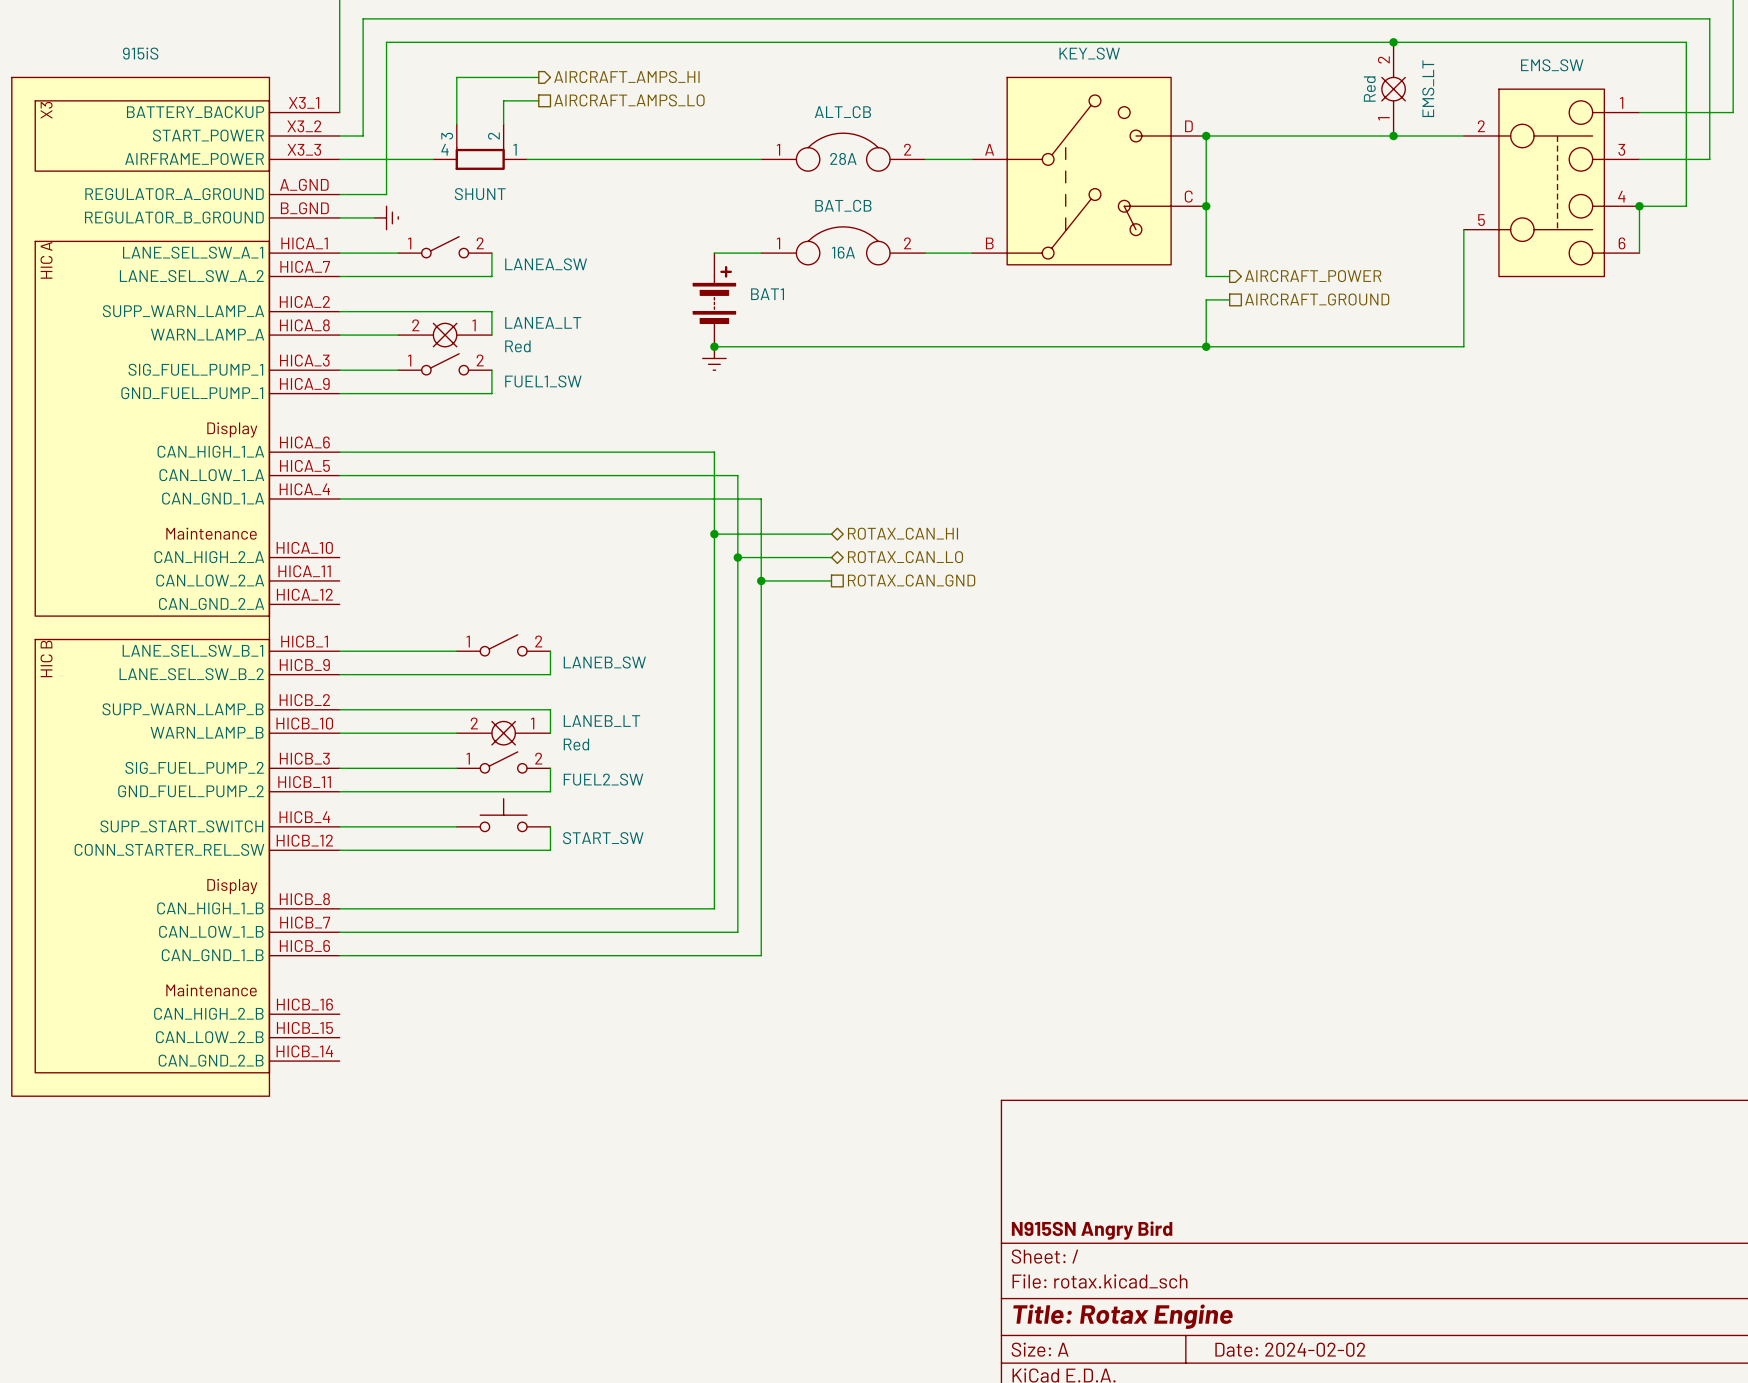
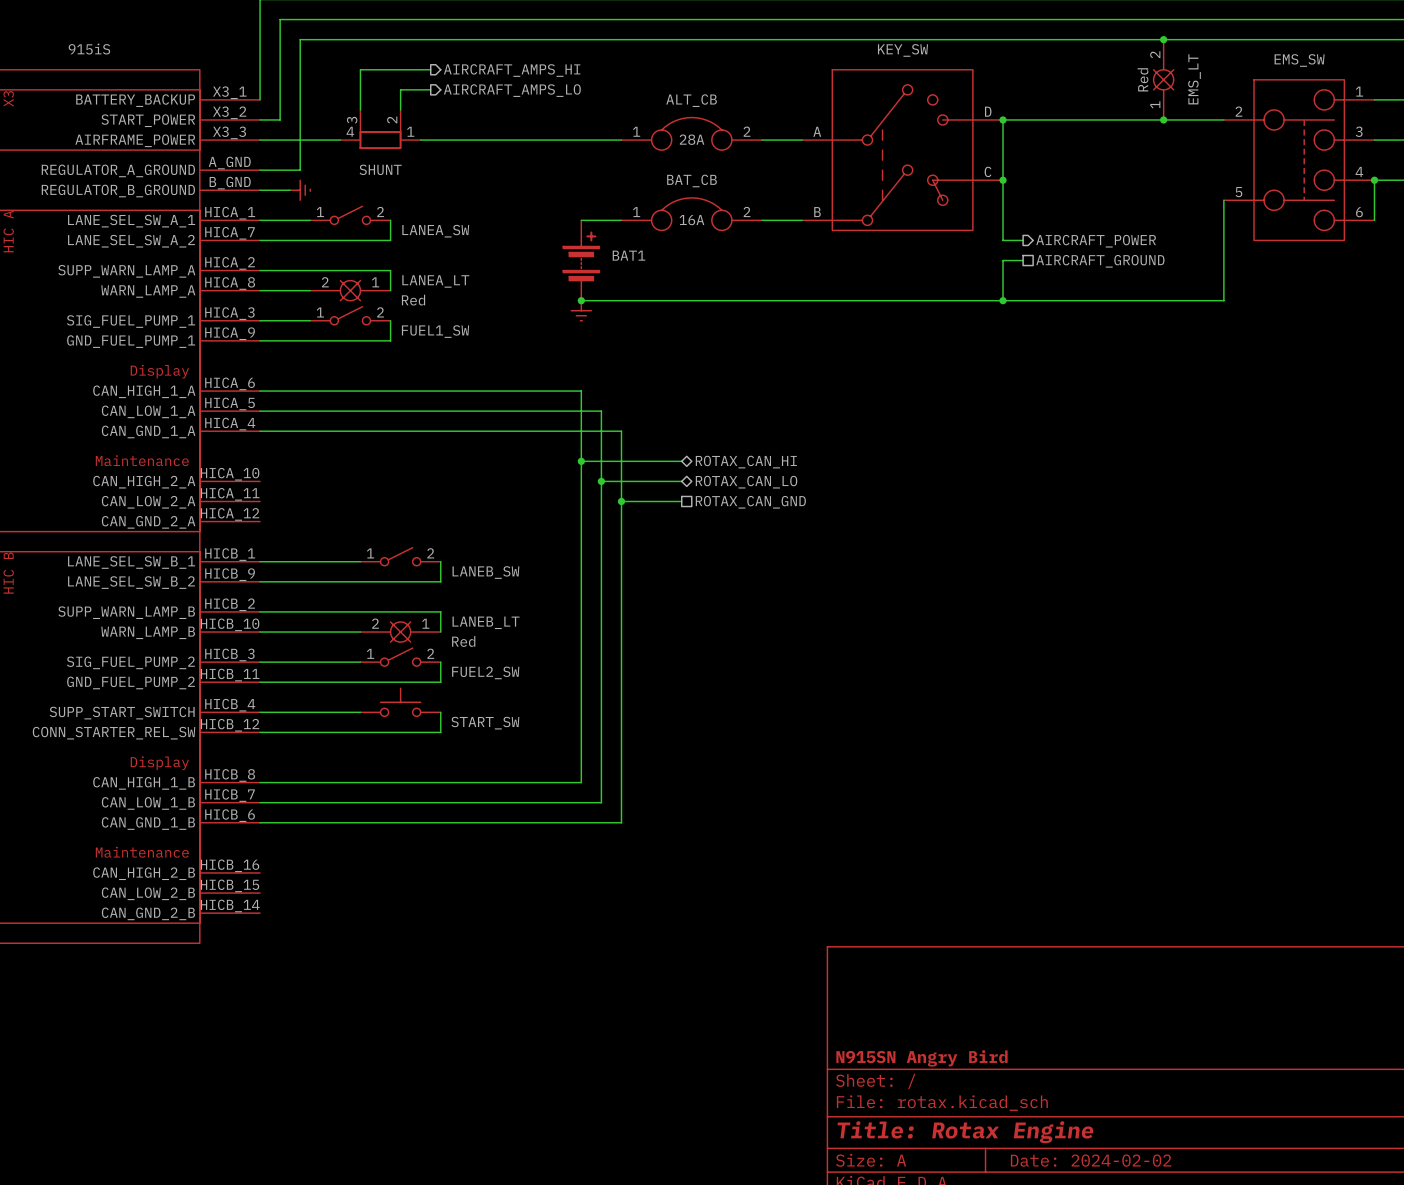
hierarchical label shape: passive (629, 100) -> output (512, 90)

